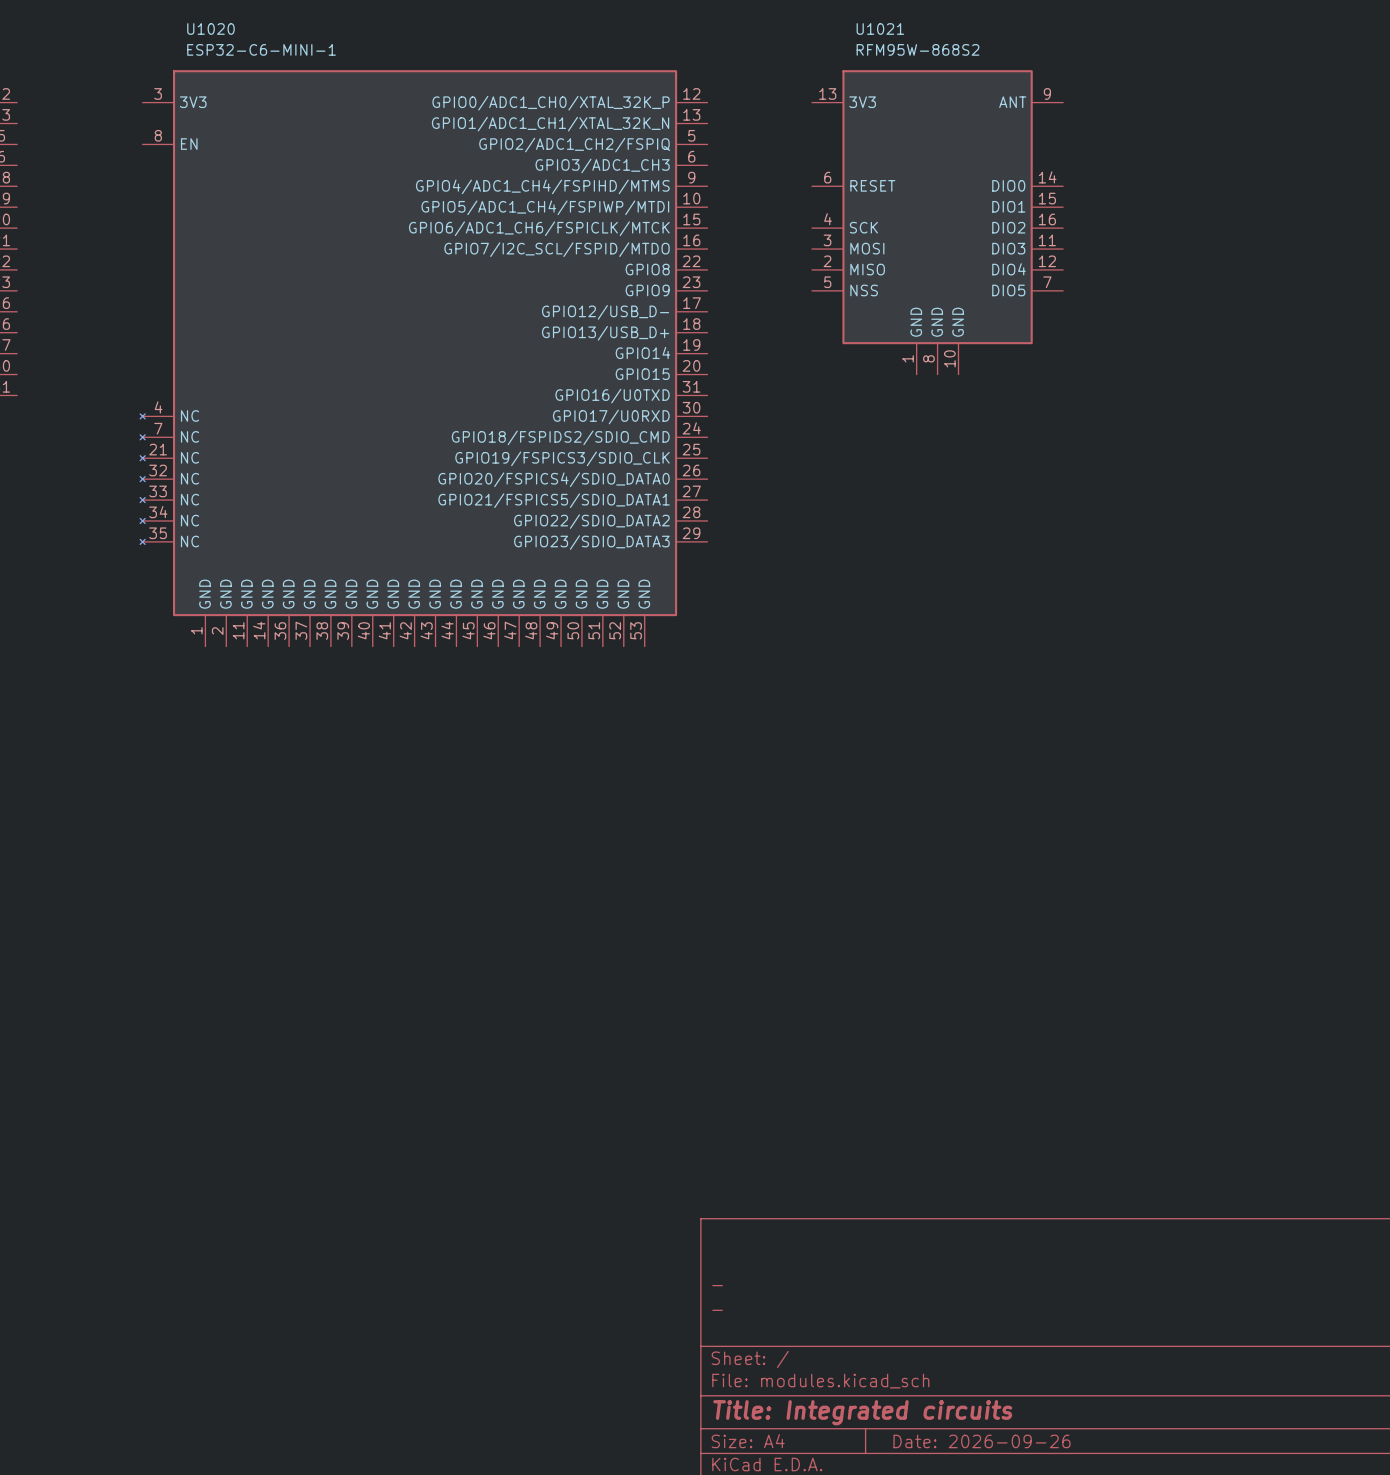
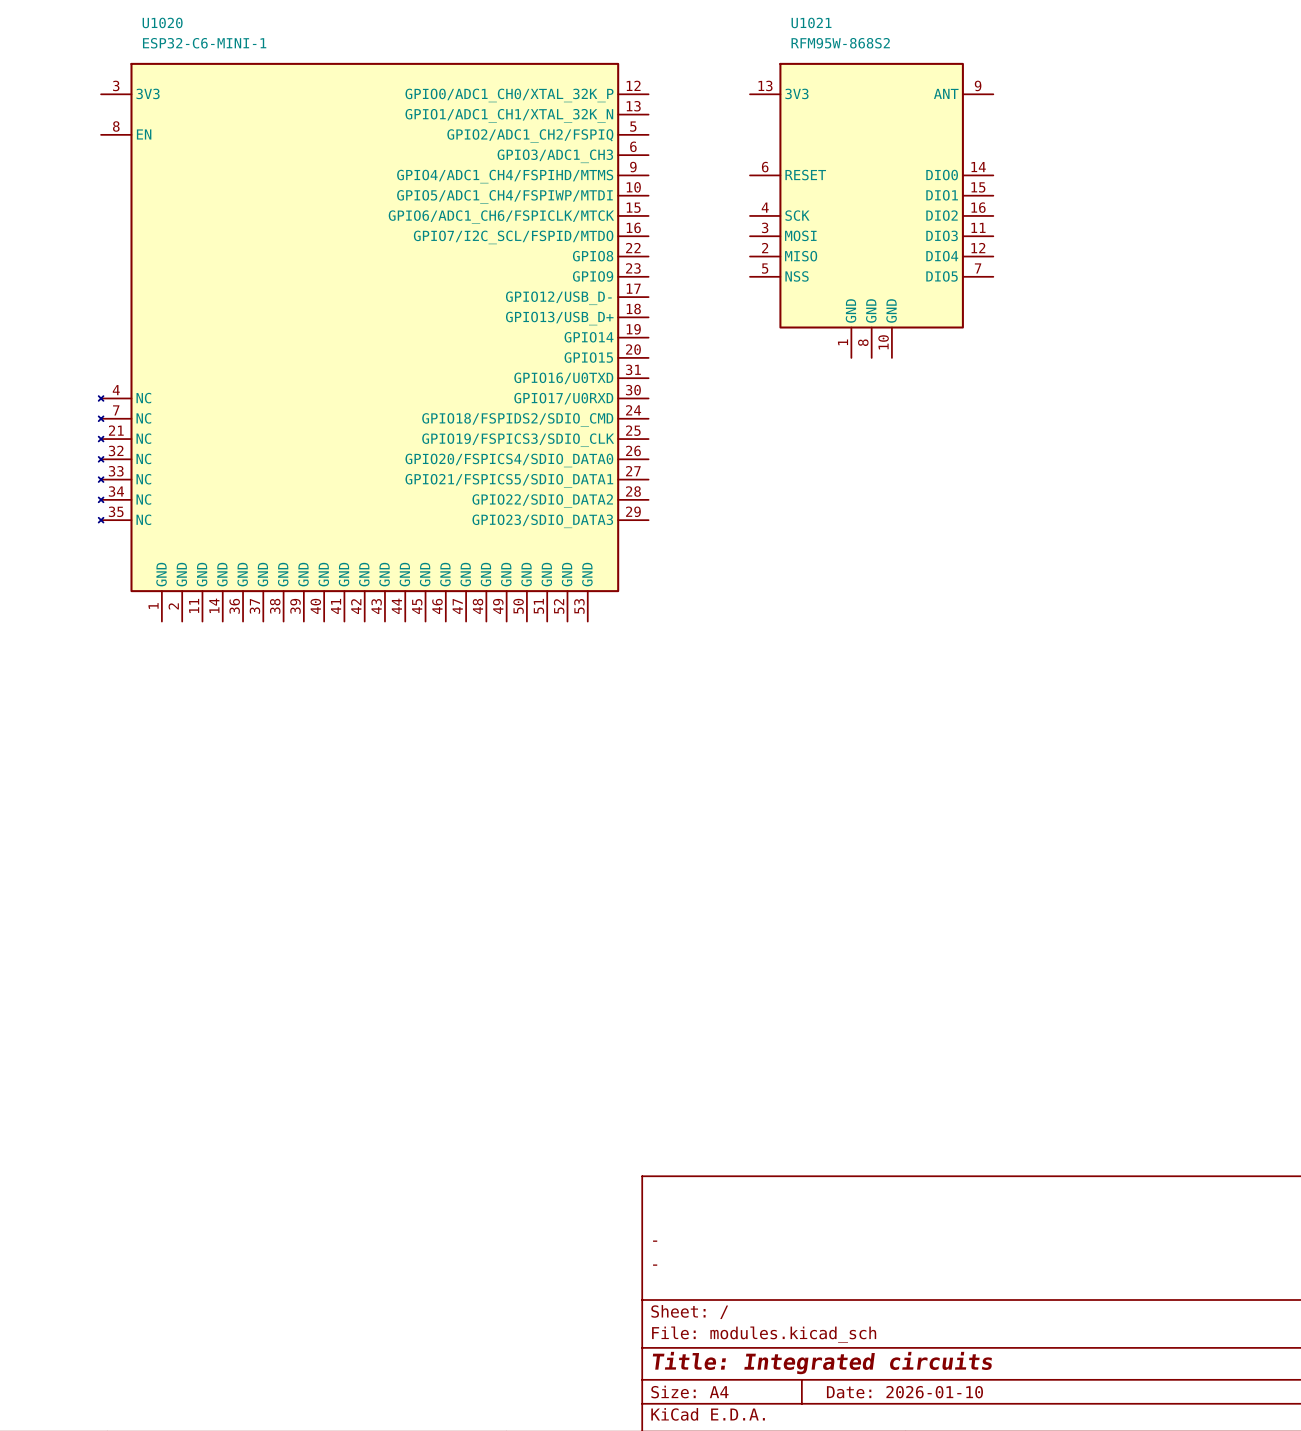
title block: Date: 2026-09-26 (982, 1441) -> Date: 2026-01-10 (904, 1392)

